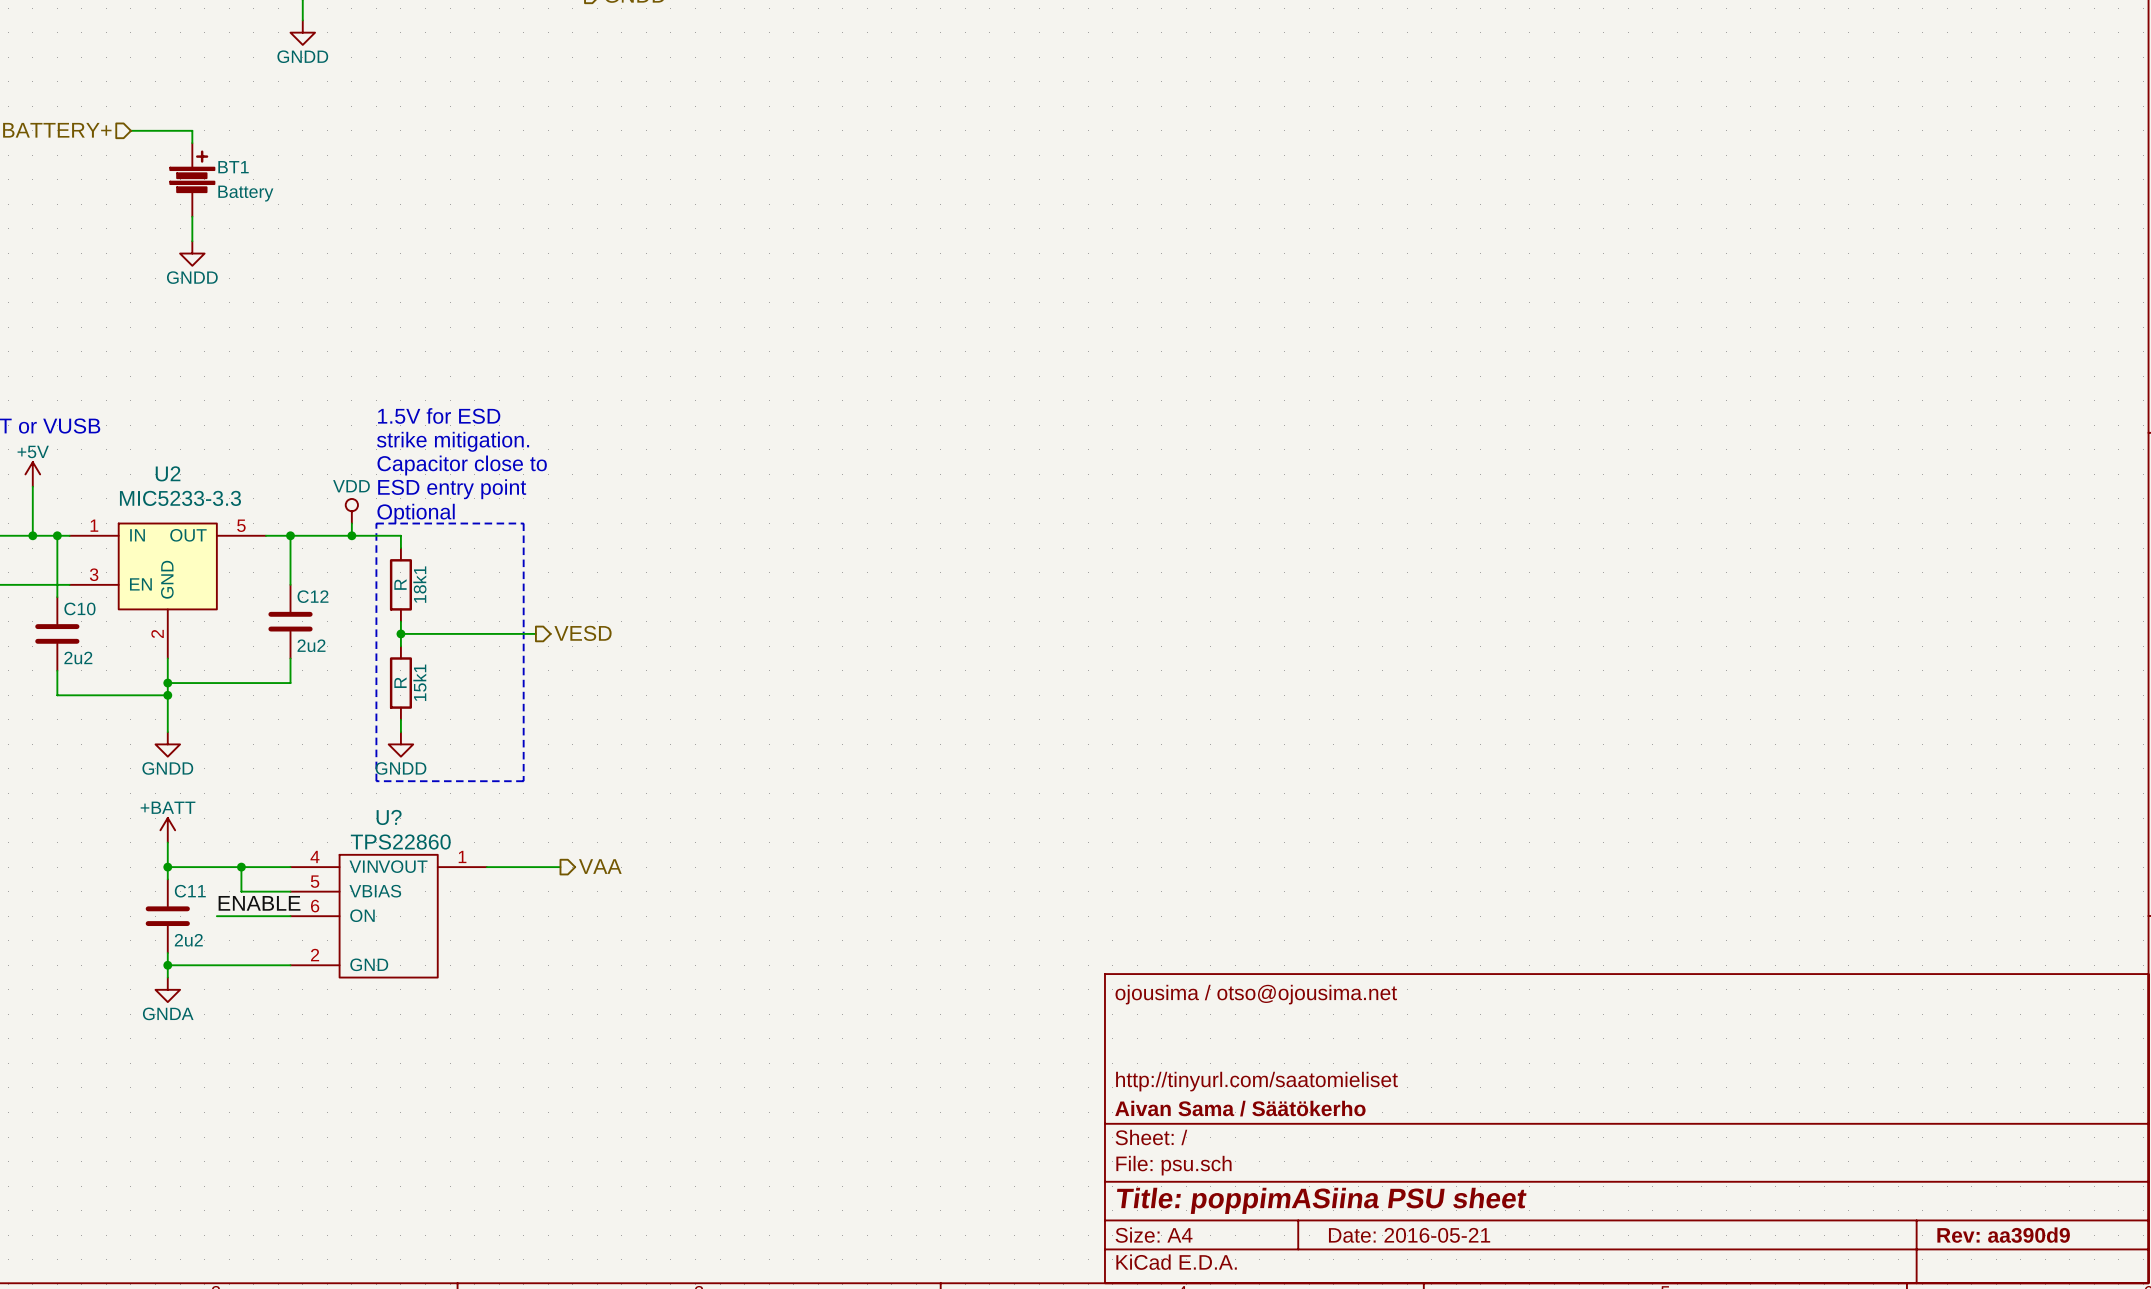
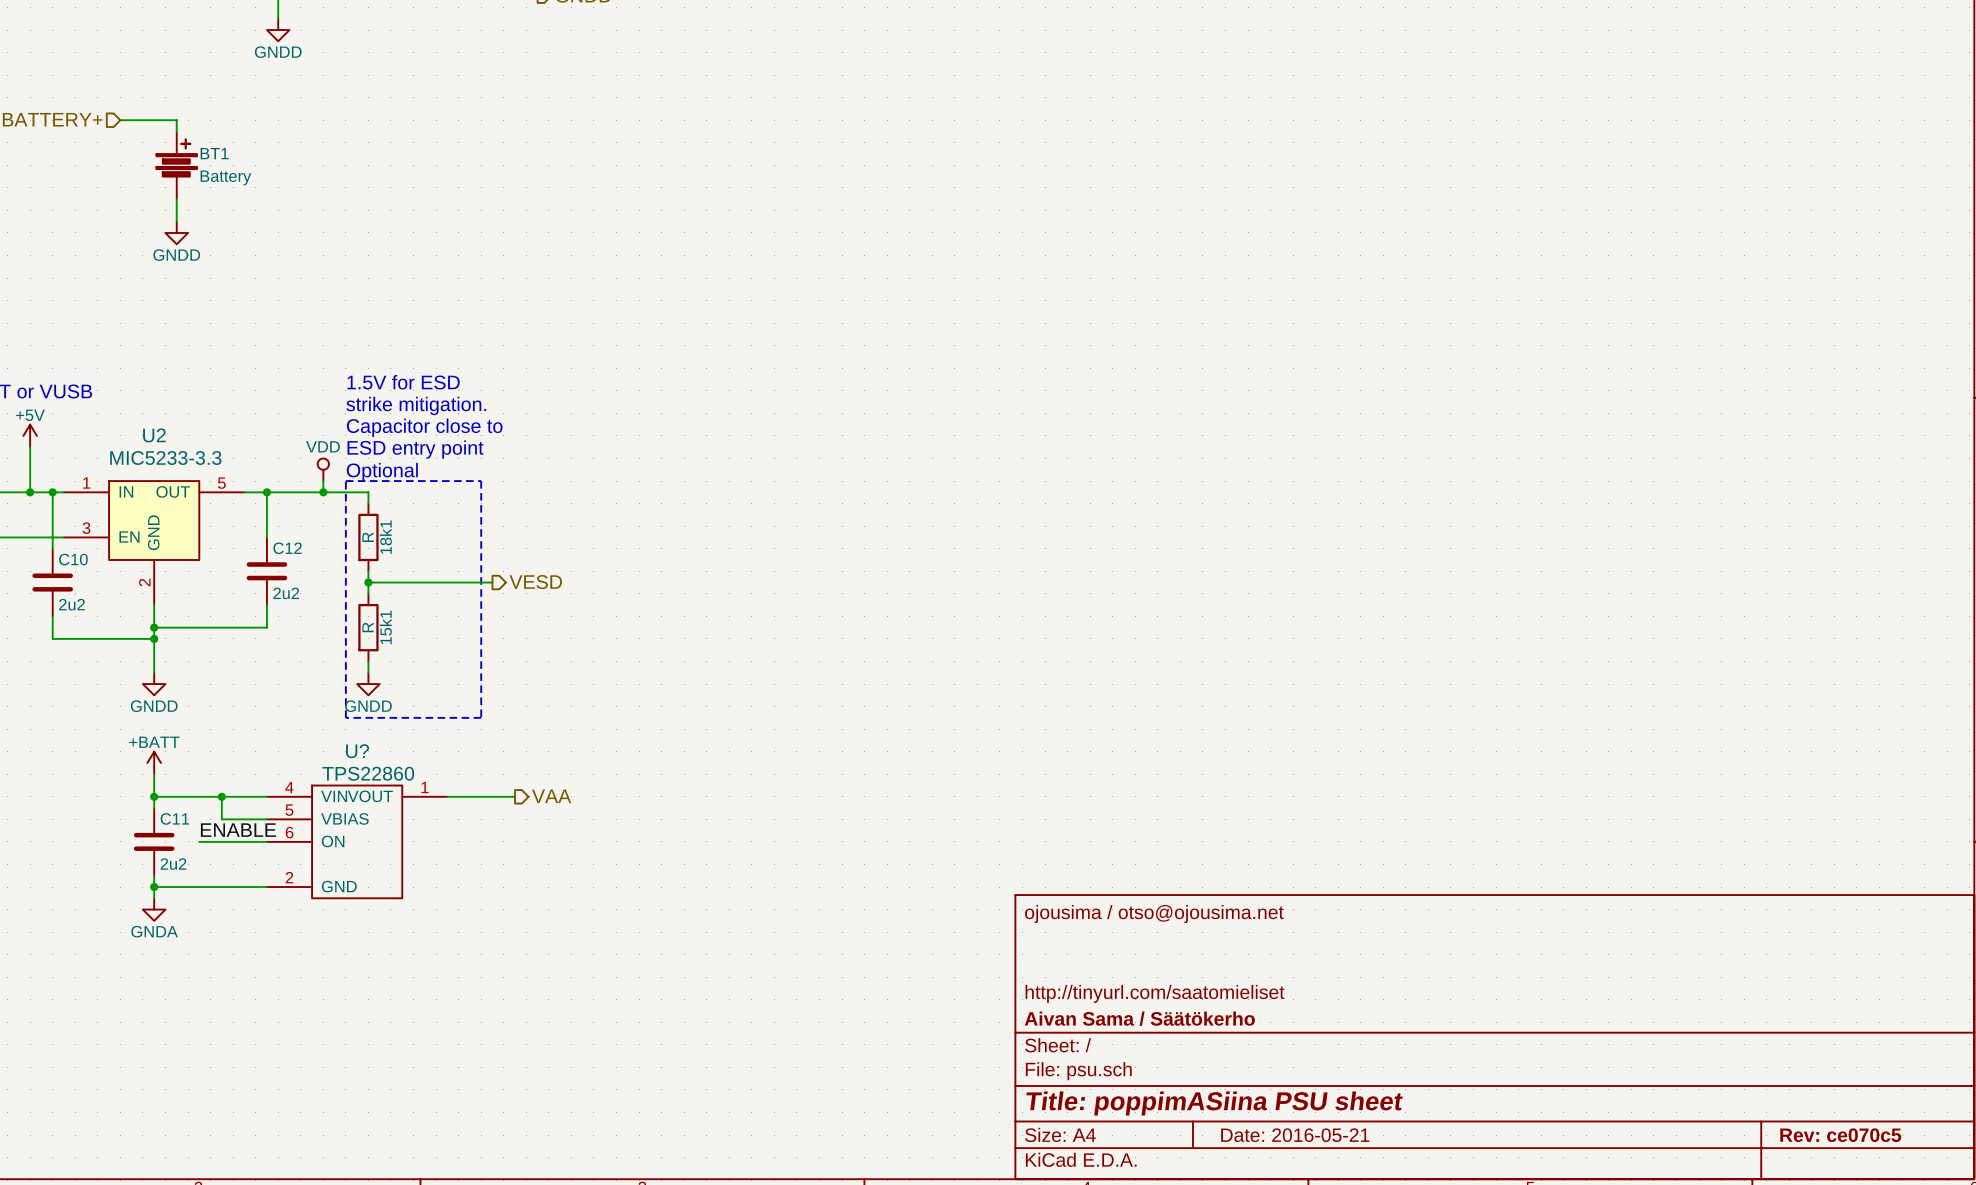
title block: Rev: aa390d9 (2003, 1235) -> Rev: ce070c5 (1840, 1135)

